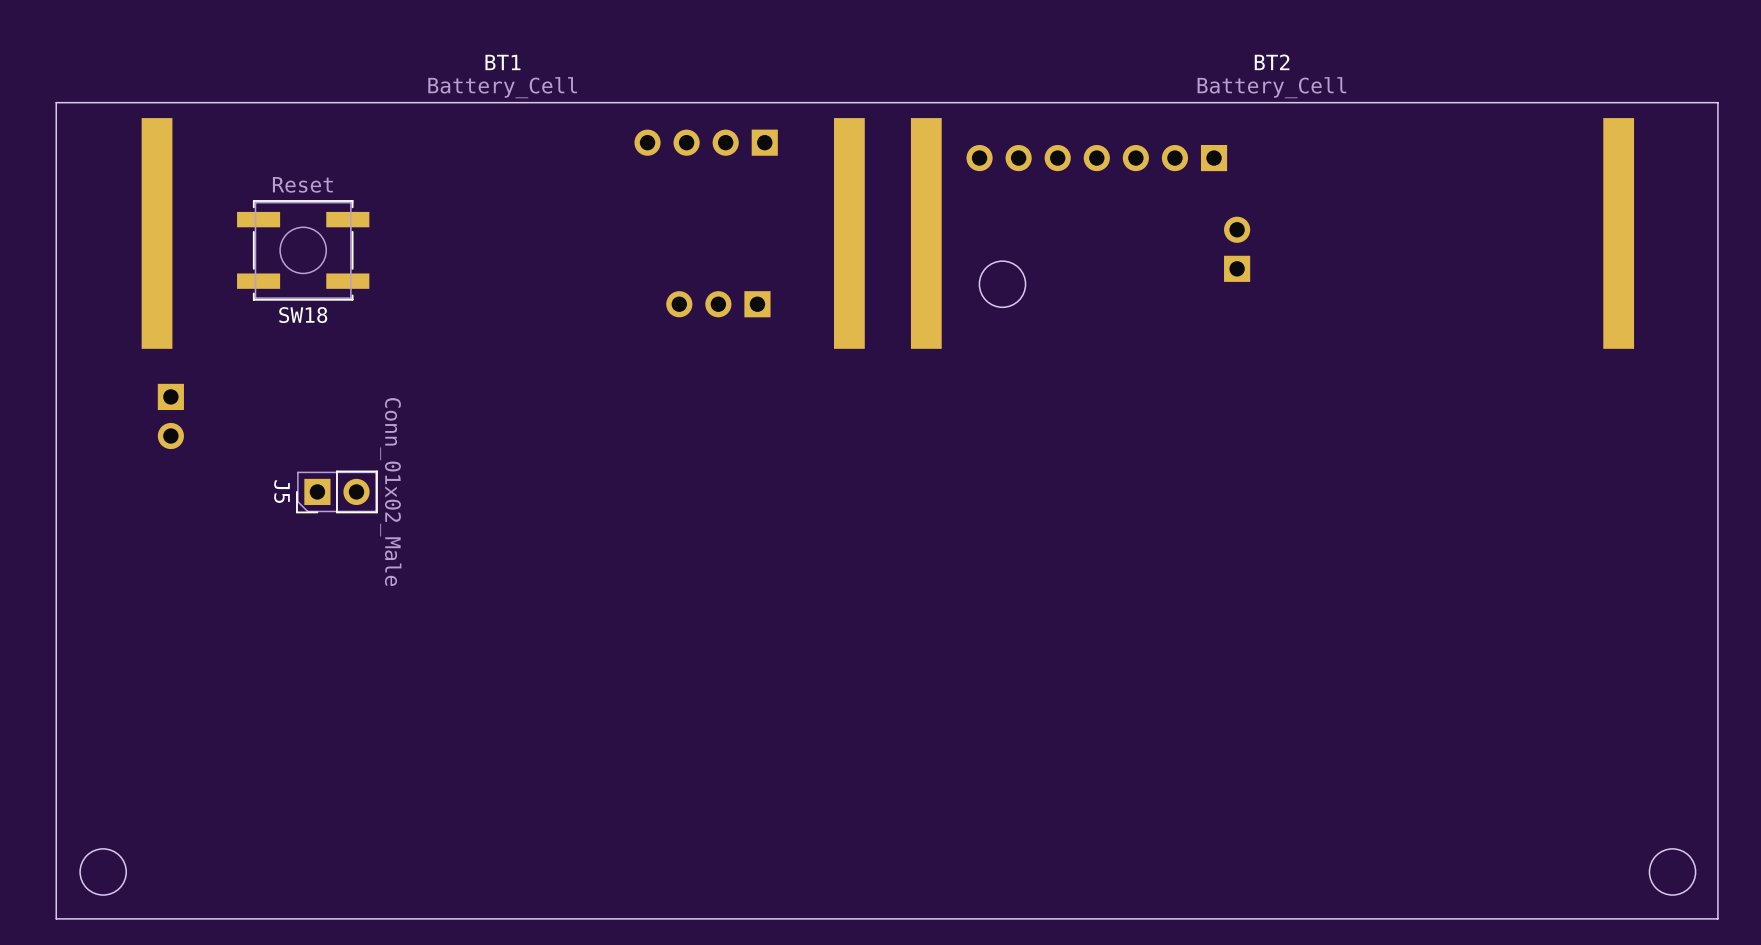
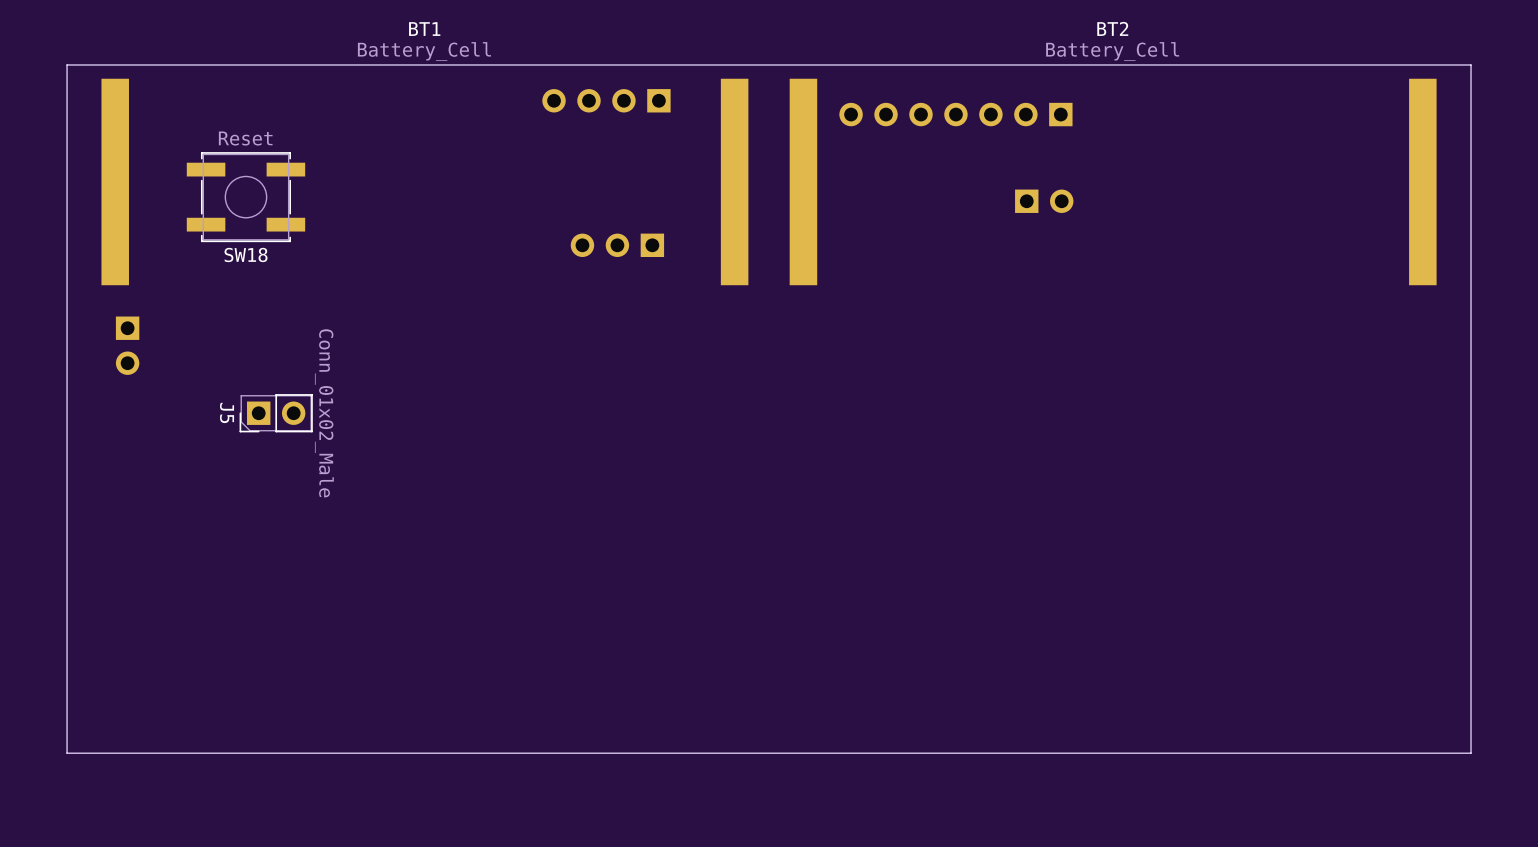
board edge: (1672, 102) (1717, 102) (1717, 918) (56, 918) (56, 102) (103, 102) -> (1471, 64) (1471, 753) (67, 753) (67, 64)
part rotation: 0° (1237, 249) -> 90° clockwise (1044, 201)
part position: (1237, 249) -> (1044, 201)
round board edge: [978, 260, 1027, 309] -> none
round board edge: [79, 848, 128, 896] -> none
round board edge: [1648, 848, 1697, 896] -> none

